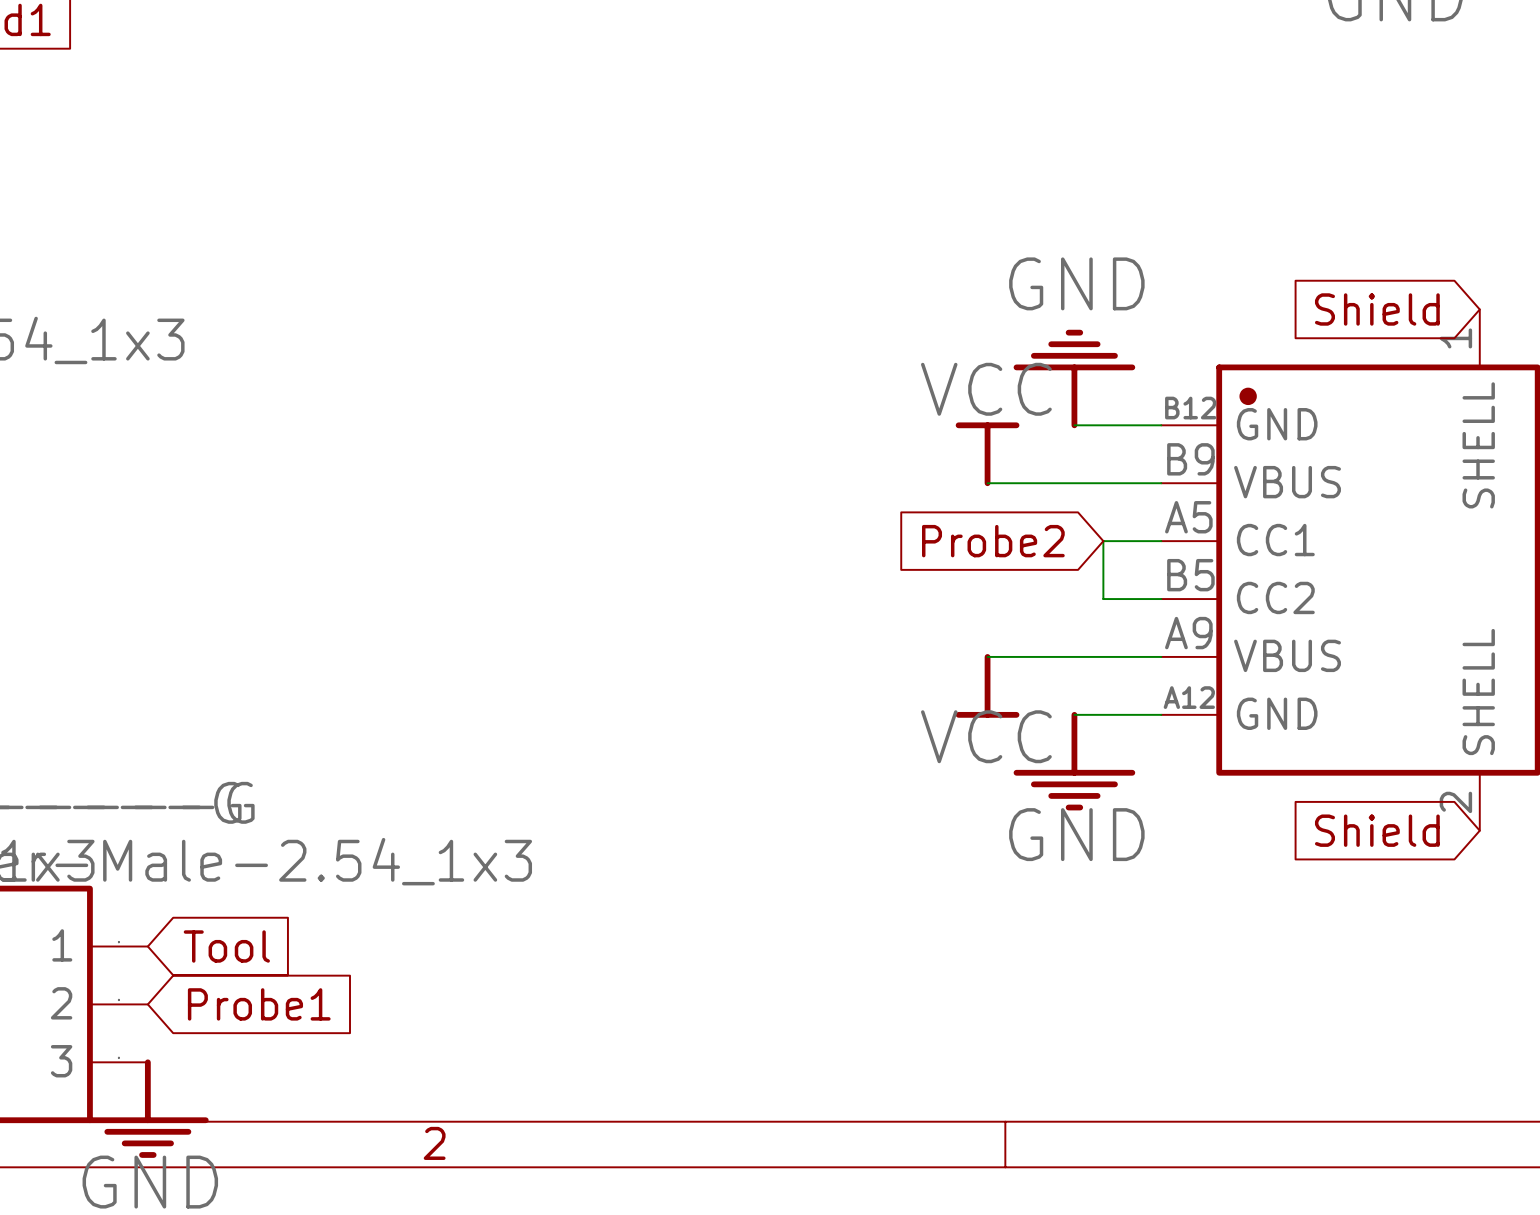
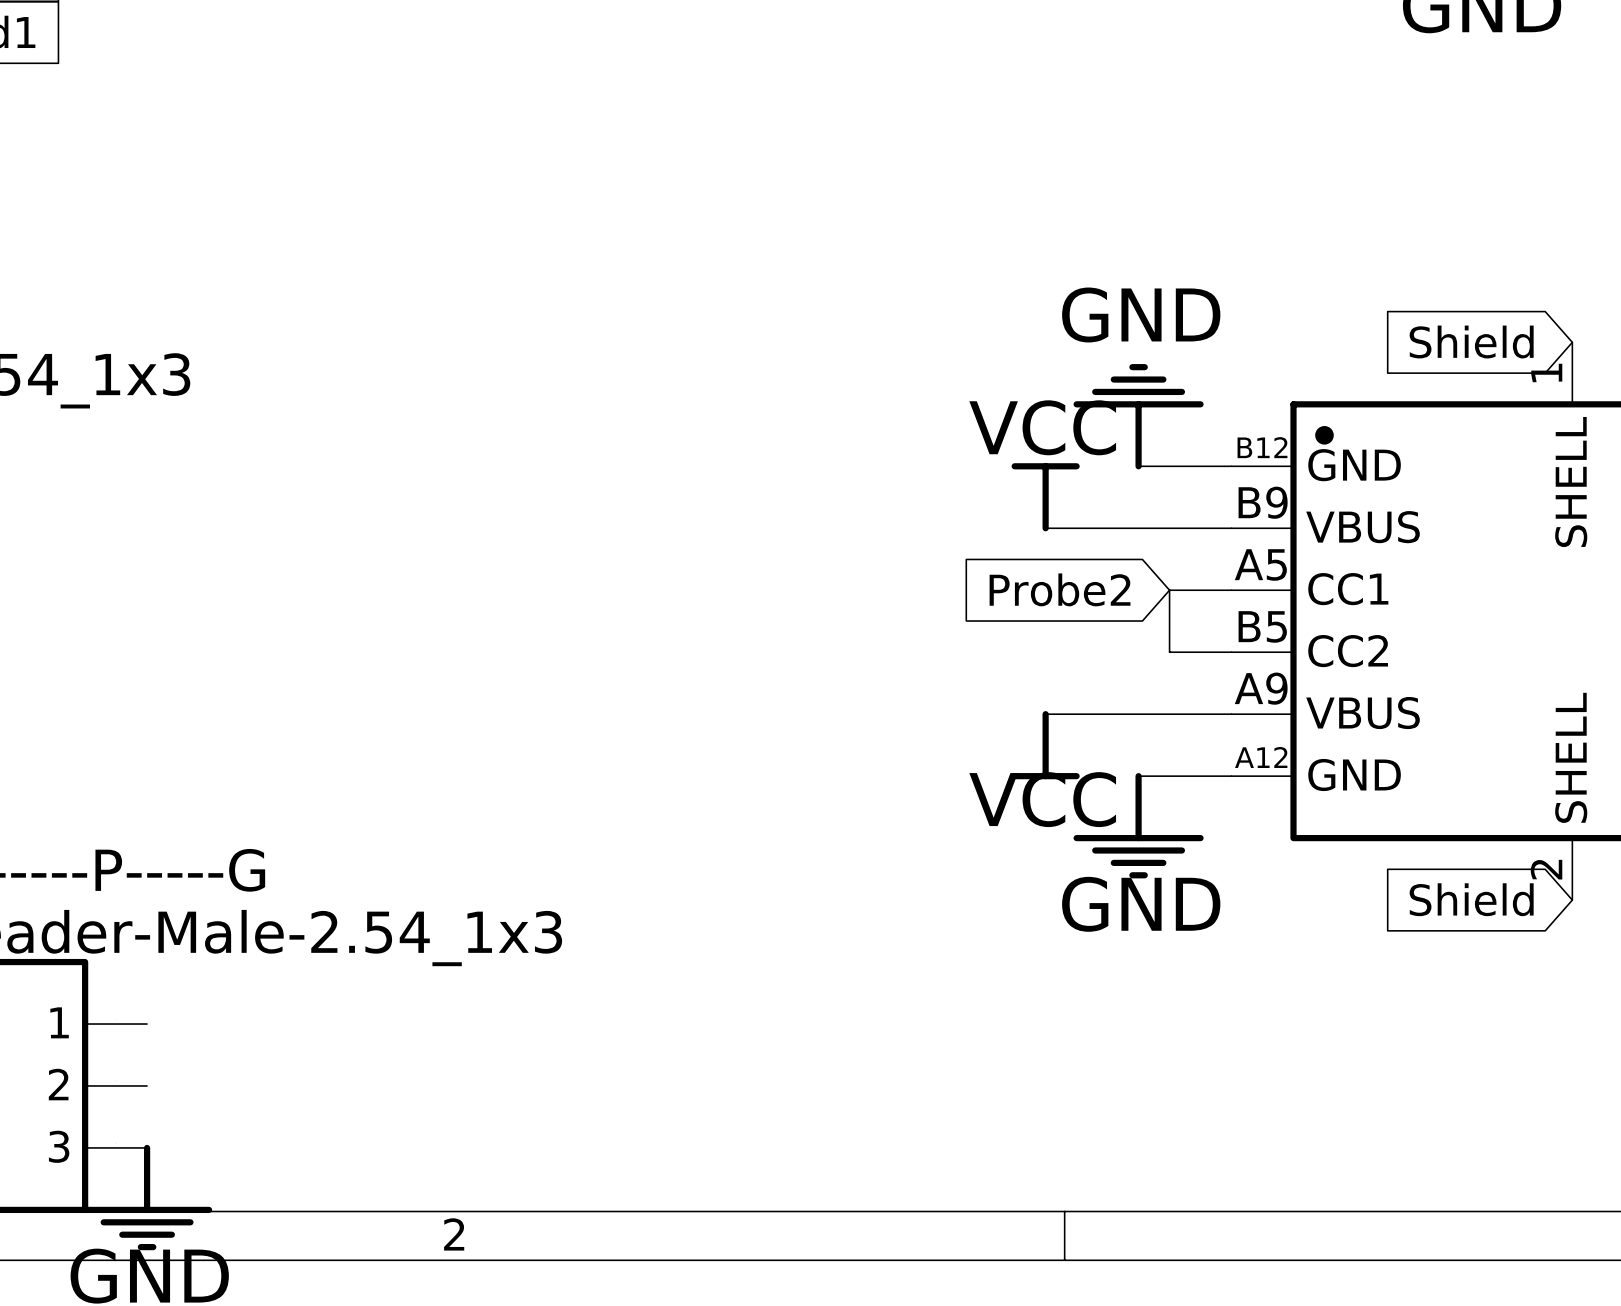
global label: Tool (226, 946) -> none
global label: Probe1 (259, 1004) -> none

